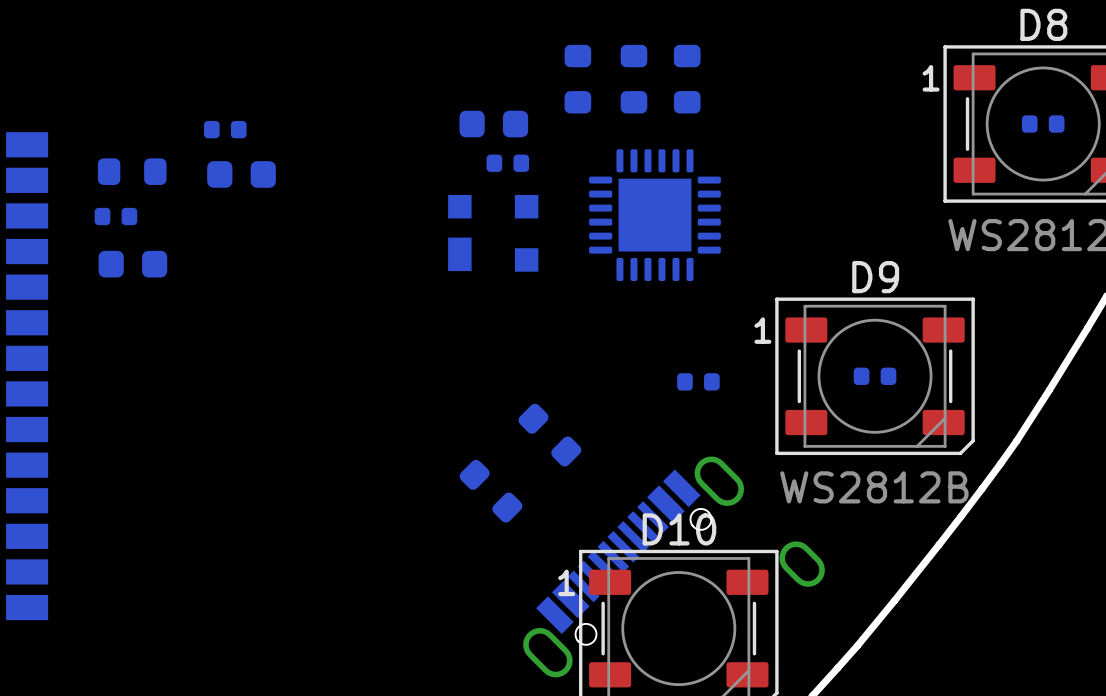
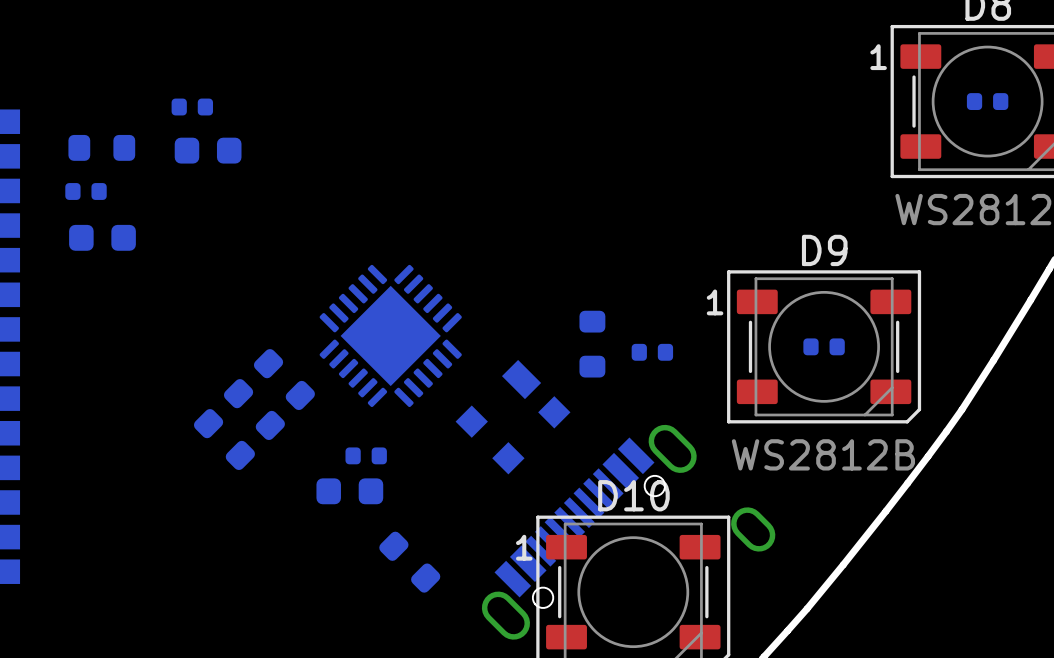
part: (577, 79) -> none
part: (633, 79) -> none
part: (687, 79) -> none
part position: (493, 124) -> (349, 491)
part position: (507, 163) -> (366, 455)
part: (654, 215) -> none
part: (493, 233) -> none
part: none -> (390, 335)
part: none -> (592, 344)
part footprint: [518, 403, 582, 467] -> [455, 359, 571, 475]
part: none -> (284, 379)
part: none -> (254, 409)
part: none -> (224, 439)
part: (491, 491) -> none
part: none -> (409, 562)

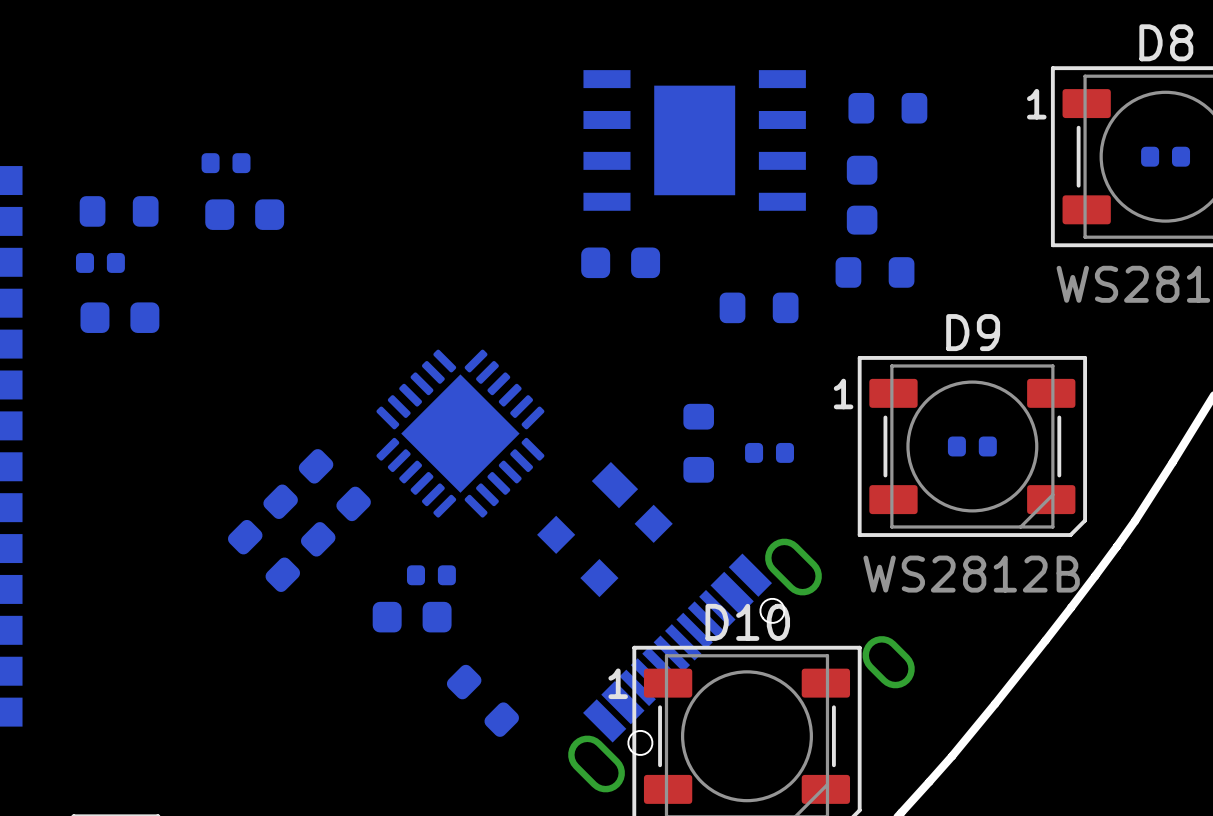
part: none -> (887, 108)
part: none -> (694, 140)
part: none -> (862, 195)
part: none -> (620, 262)
part: none -> (875, 272)
part: none -> (759, 307)

